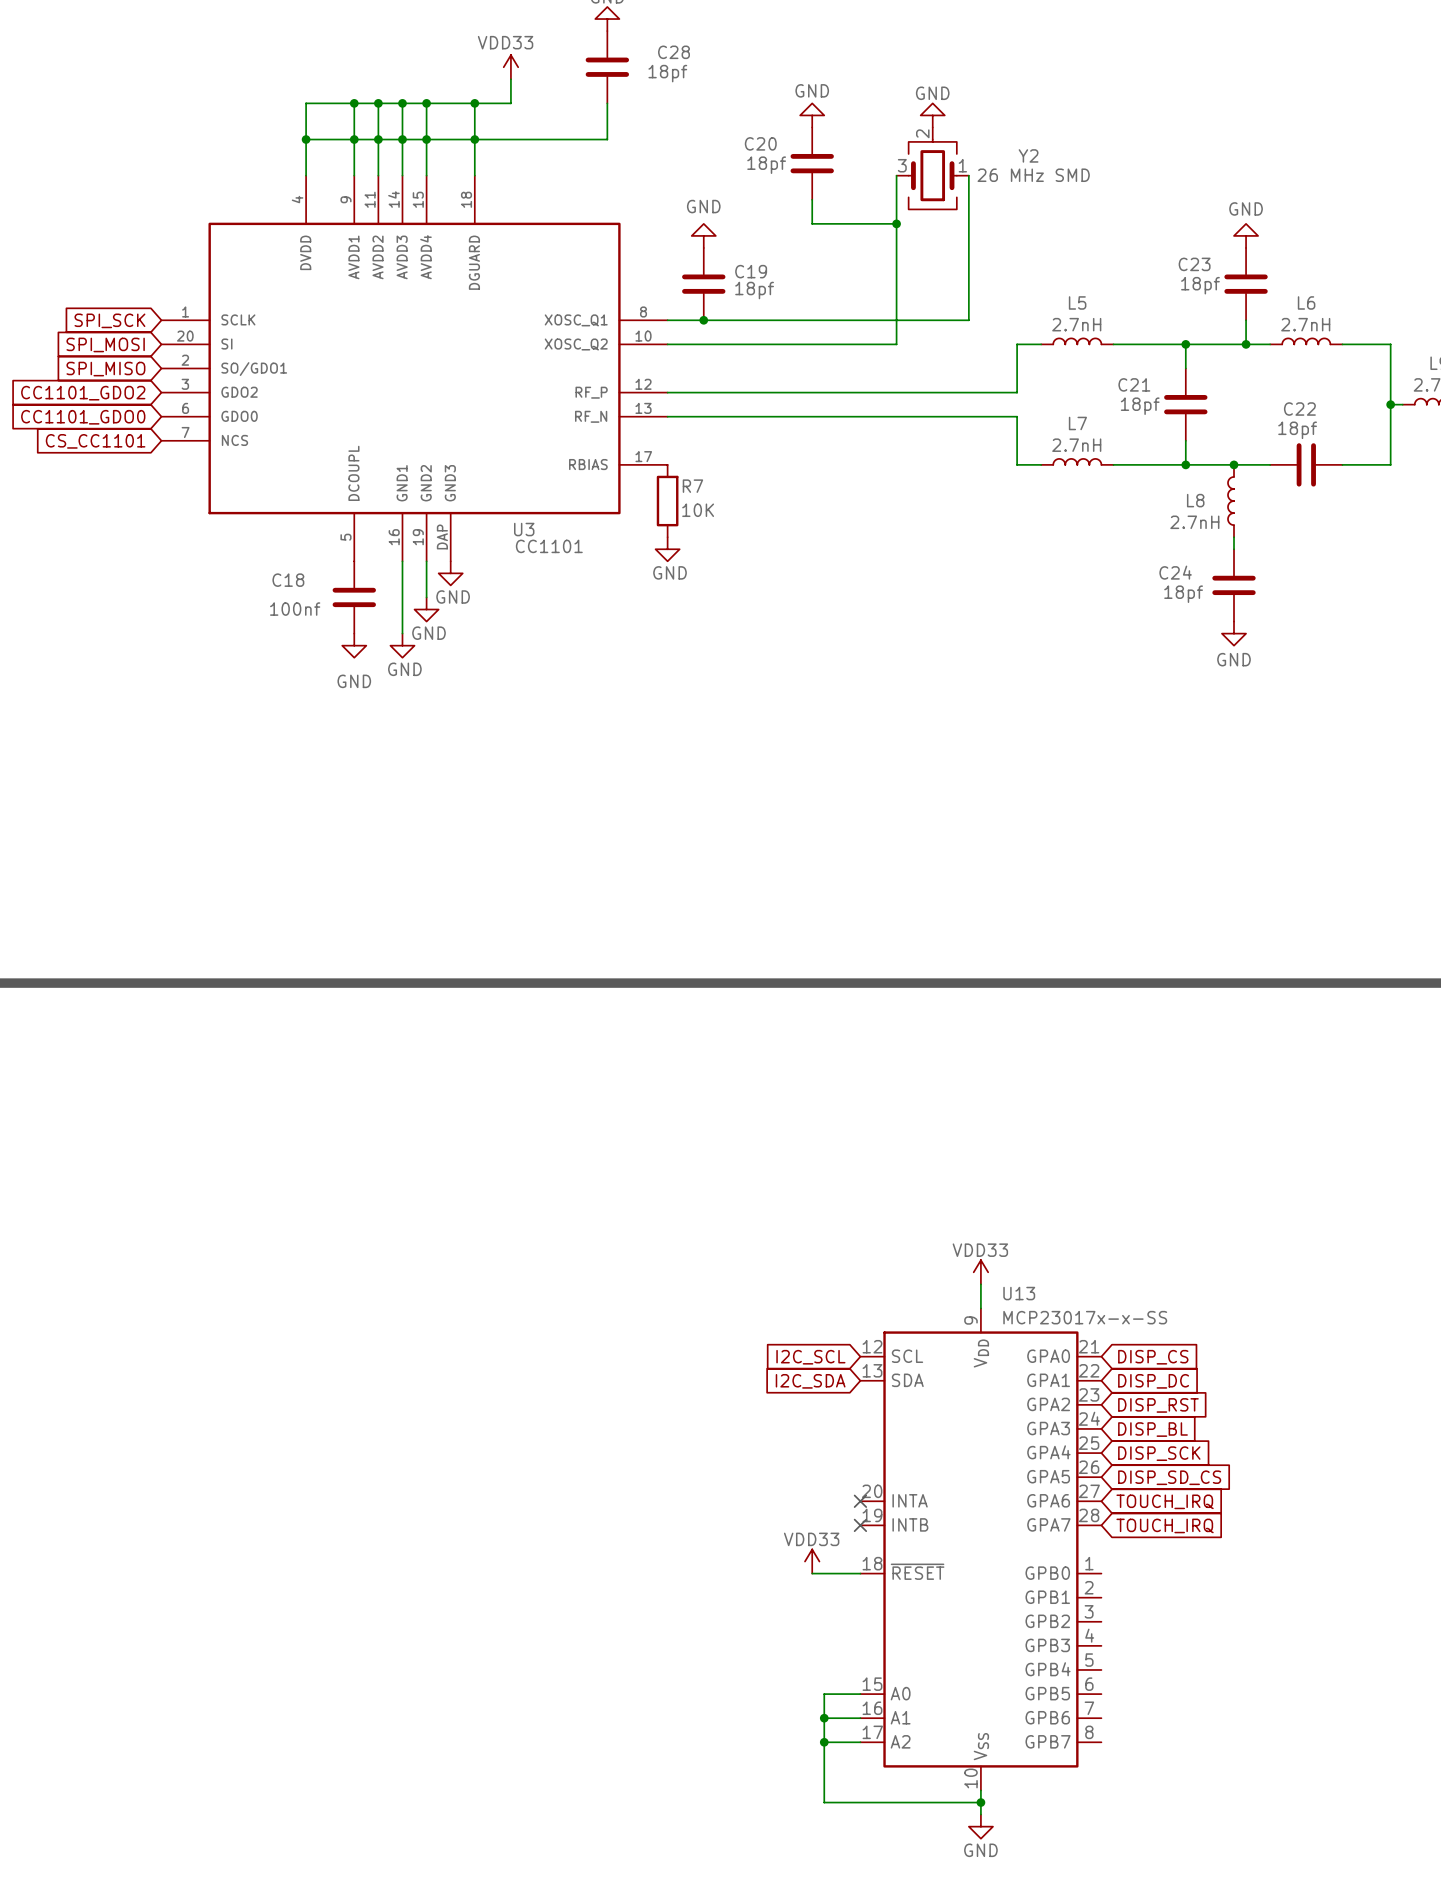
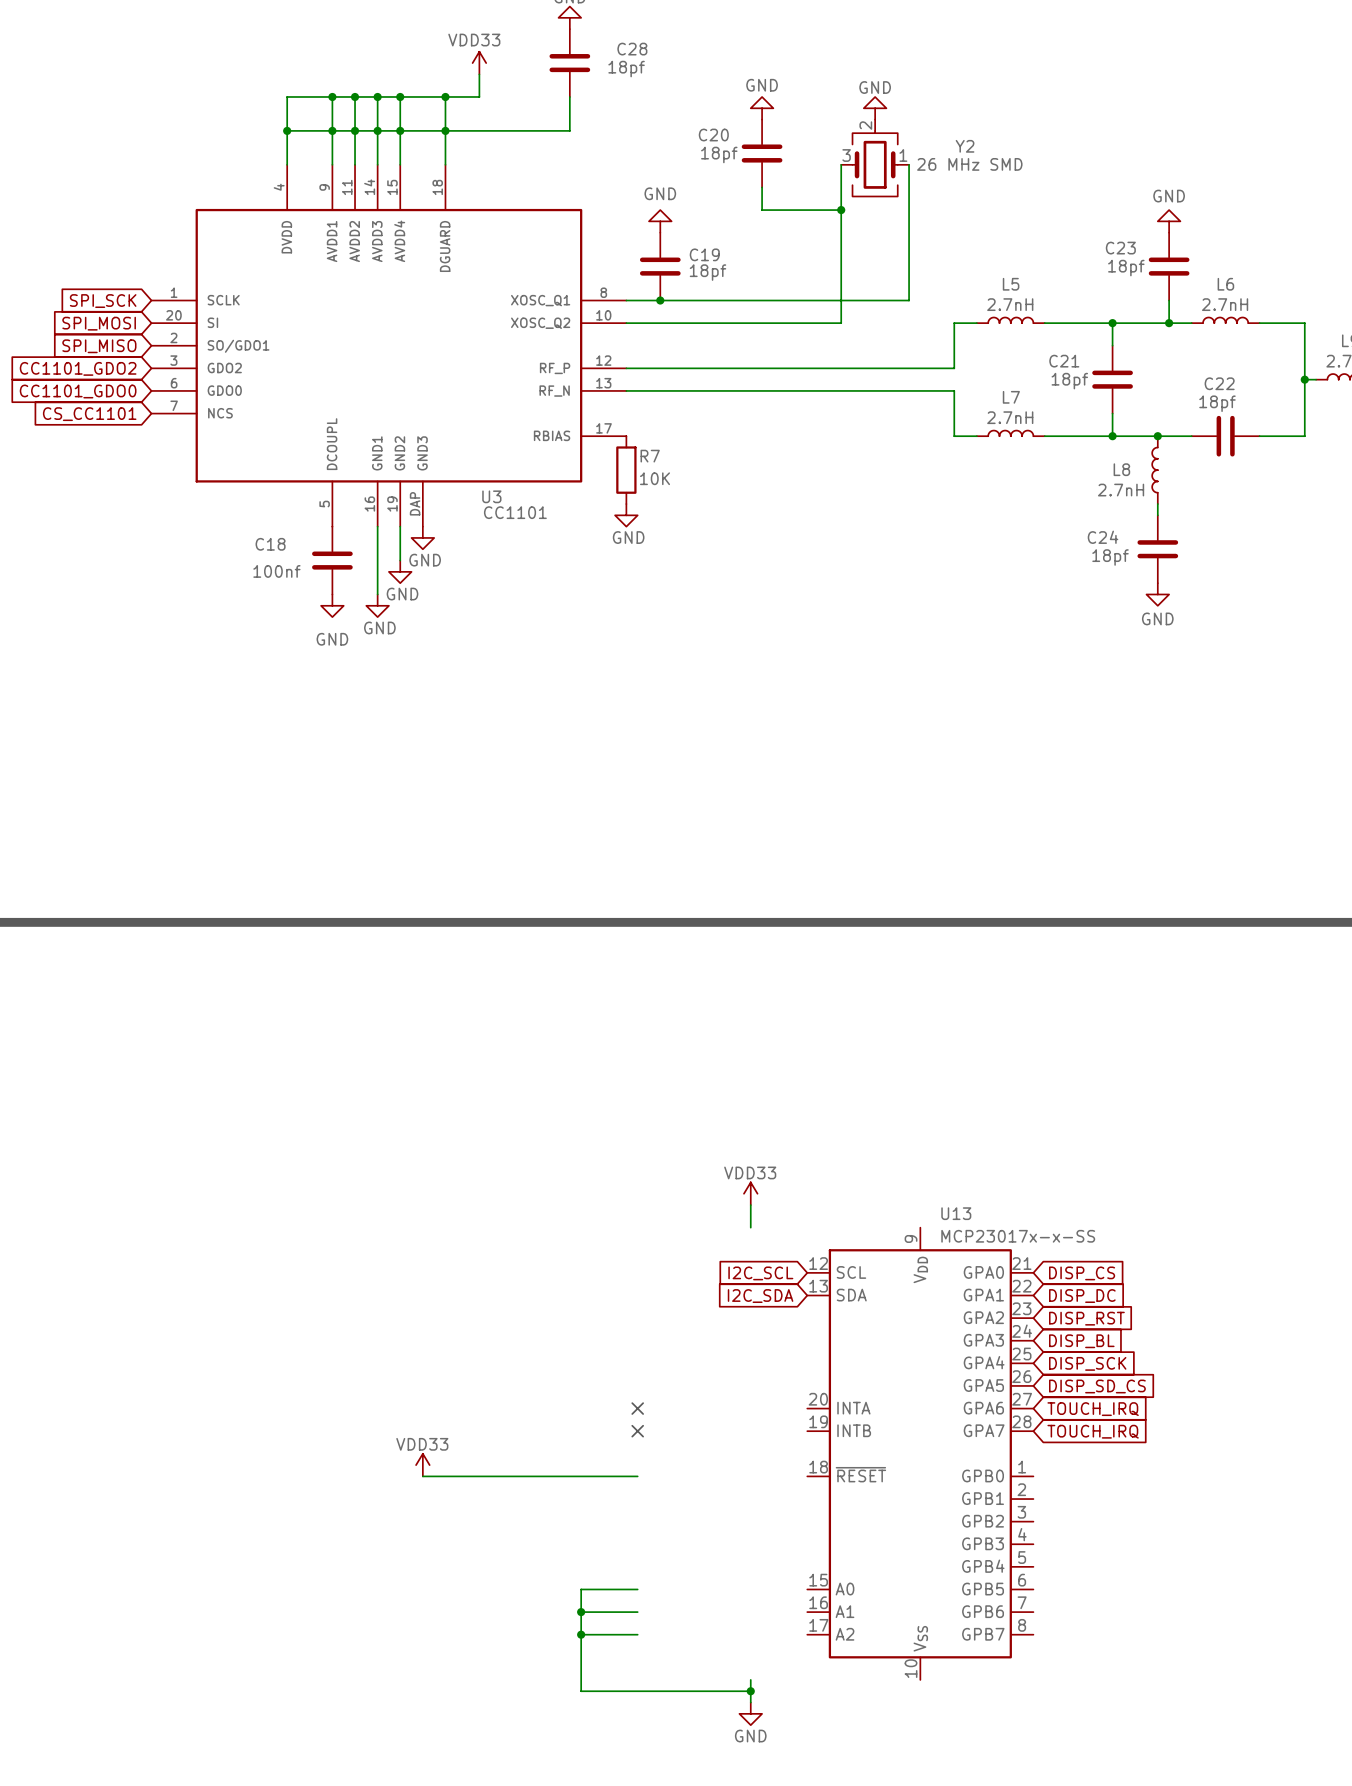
power symbol: none -> VDD33 (750, 1193)
power symbol: VDD33 (980, 1272) -> none
wire: (980, 1284) (980, 1308) -> (750, 1205) (750, 1227)
no-connect mark: none -> (637, 1408)
no-connect mark: (860, 1501) -> none
no-connect mark: none -> (637, 1431)
no-connect mark: (860, 1525) -> none
power symbol: none -> VDD33 (422, 1465)
power symbol: VDD33 (812, 1561) -> none
wire: none -> (422, 1476) (637, 1476)
wire: (812, 1573) (860, 1573) -> none
wire: none -> (637, 1589) (581, 1589) (581, 1691) (750, 1691)
wire: (860, 1694) (824, 1694) (824, 1802) (980, 1802) -> none
wire: none -> (581, 1612) (637, 1612)
junction: none -> (581, 1612)
wire: (824, 1718) (860, 1718) -> none
junction: (824, 1718) -> none
wire: none -> (581, 1634) (637, 1634)
junction: none -> (581, 1634)
wire: (824, 1742) (860, 1742) -> none
junction: (824, 1742) -> none
wire: (980, 1790) (980, 1814) -> (750, 1679) (750, 1702)
junction: none -> (750, 1691)
junction: (980, 1802) -> none
power symbol position: GND (980, 1826) -> GND (750, 1713)

